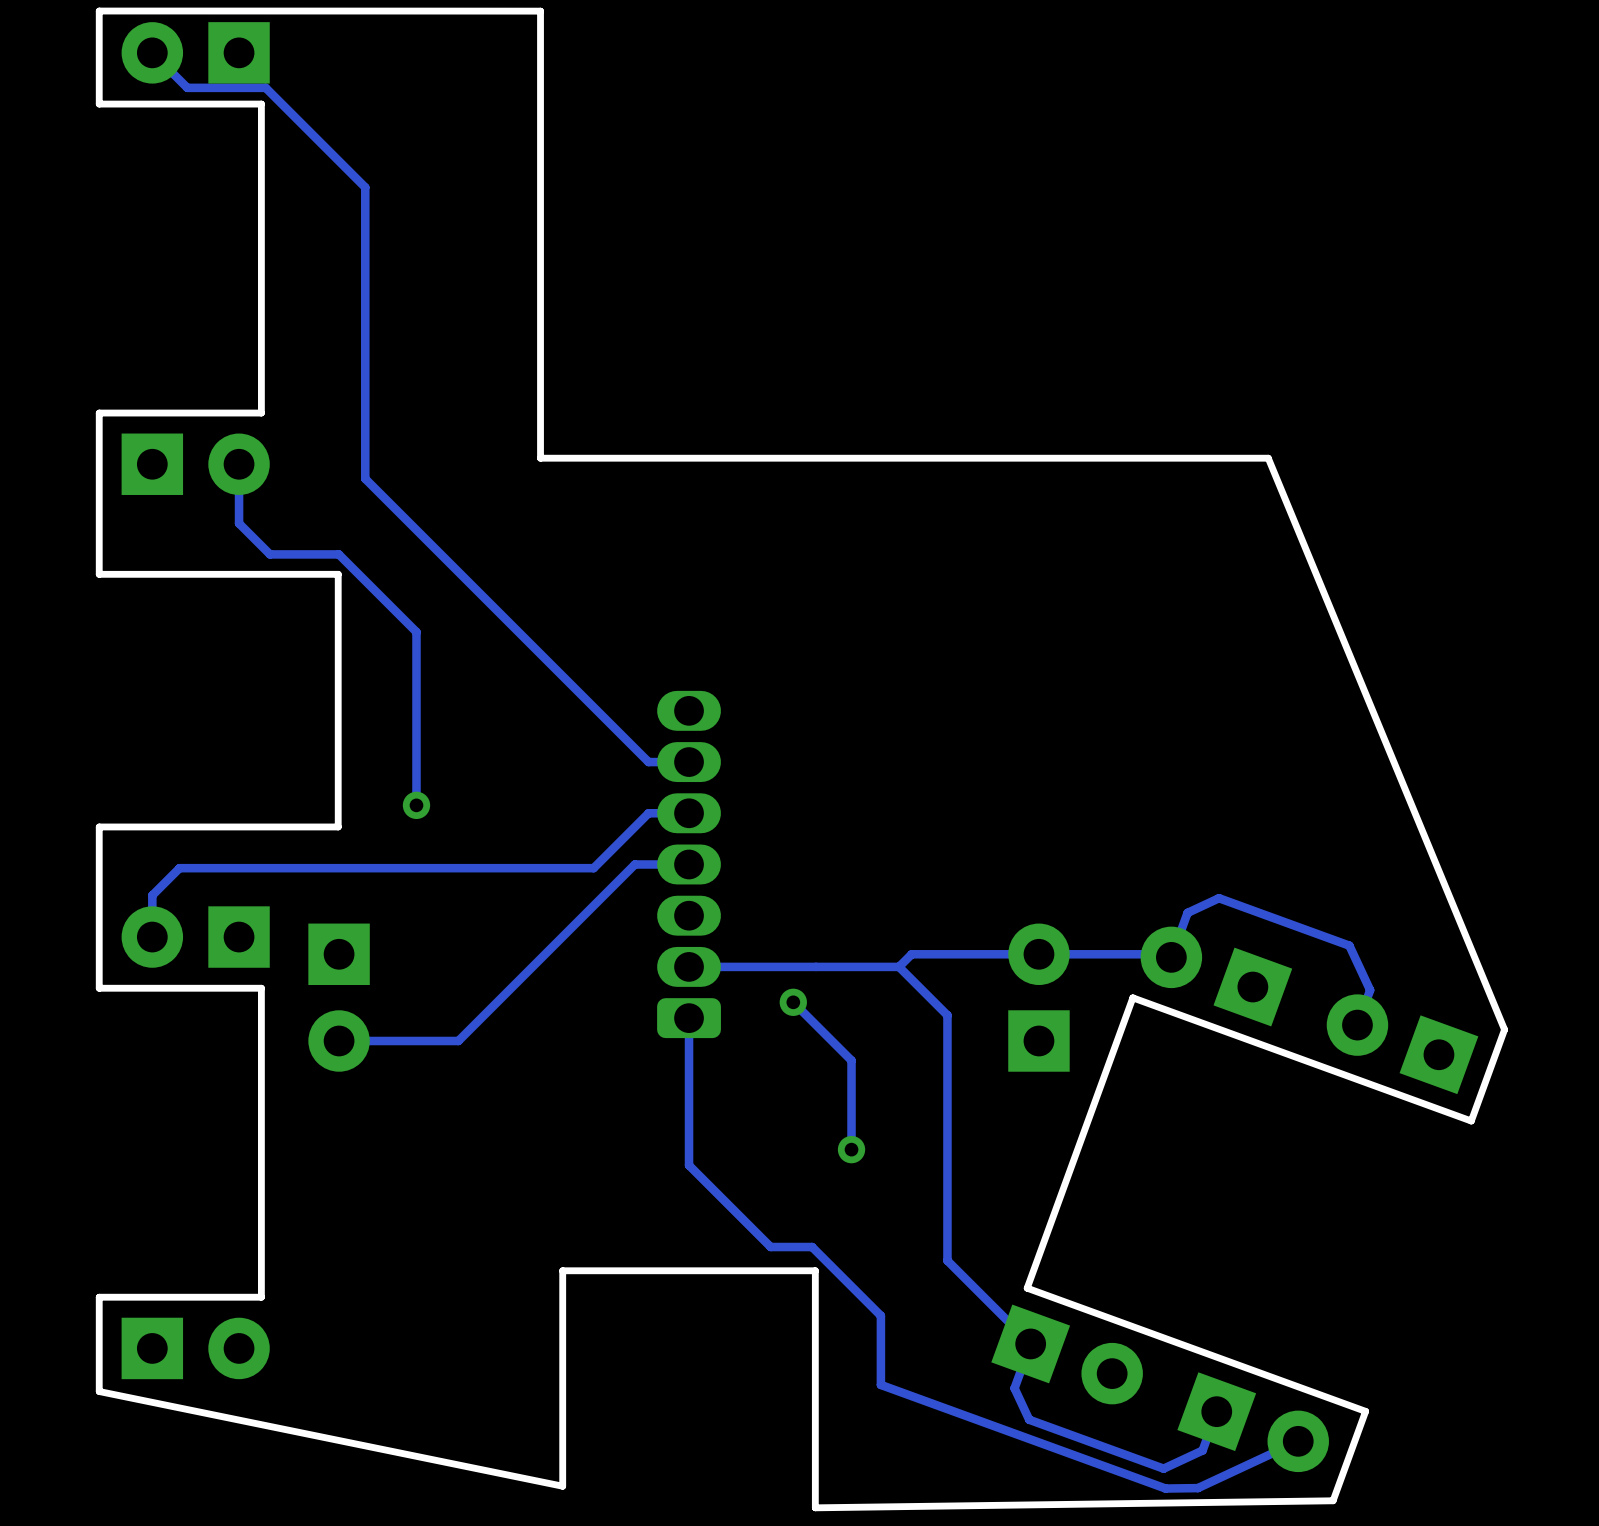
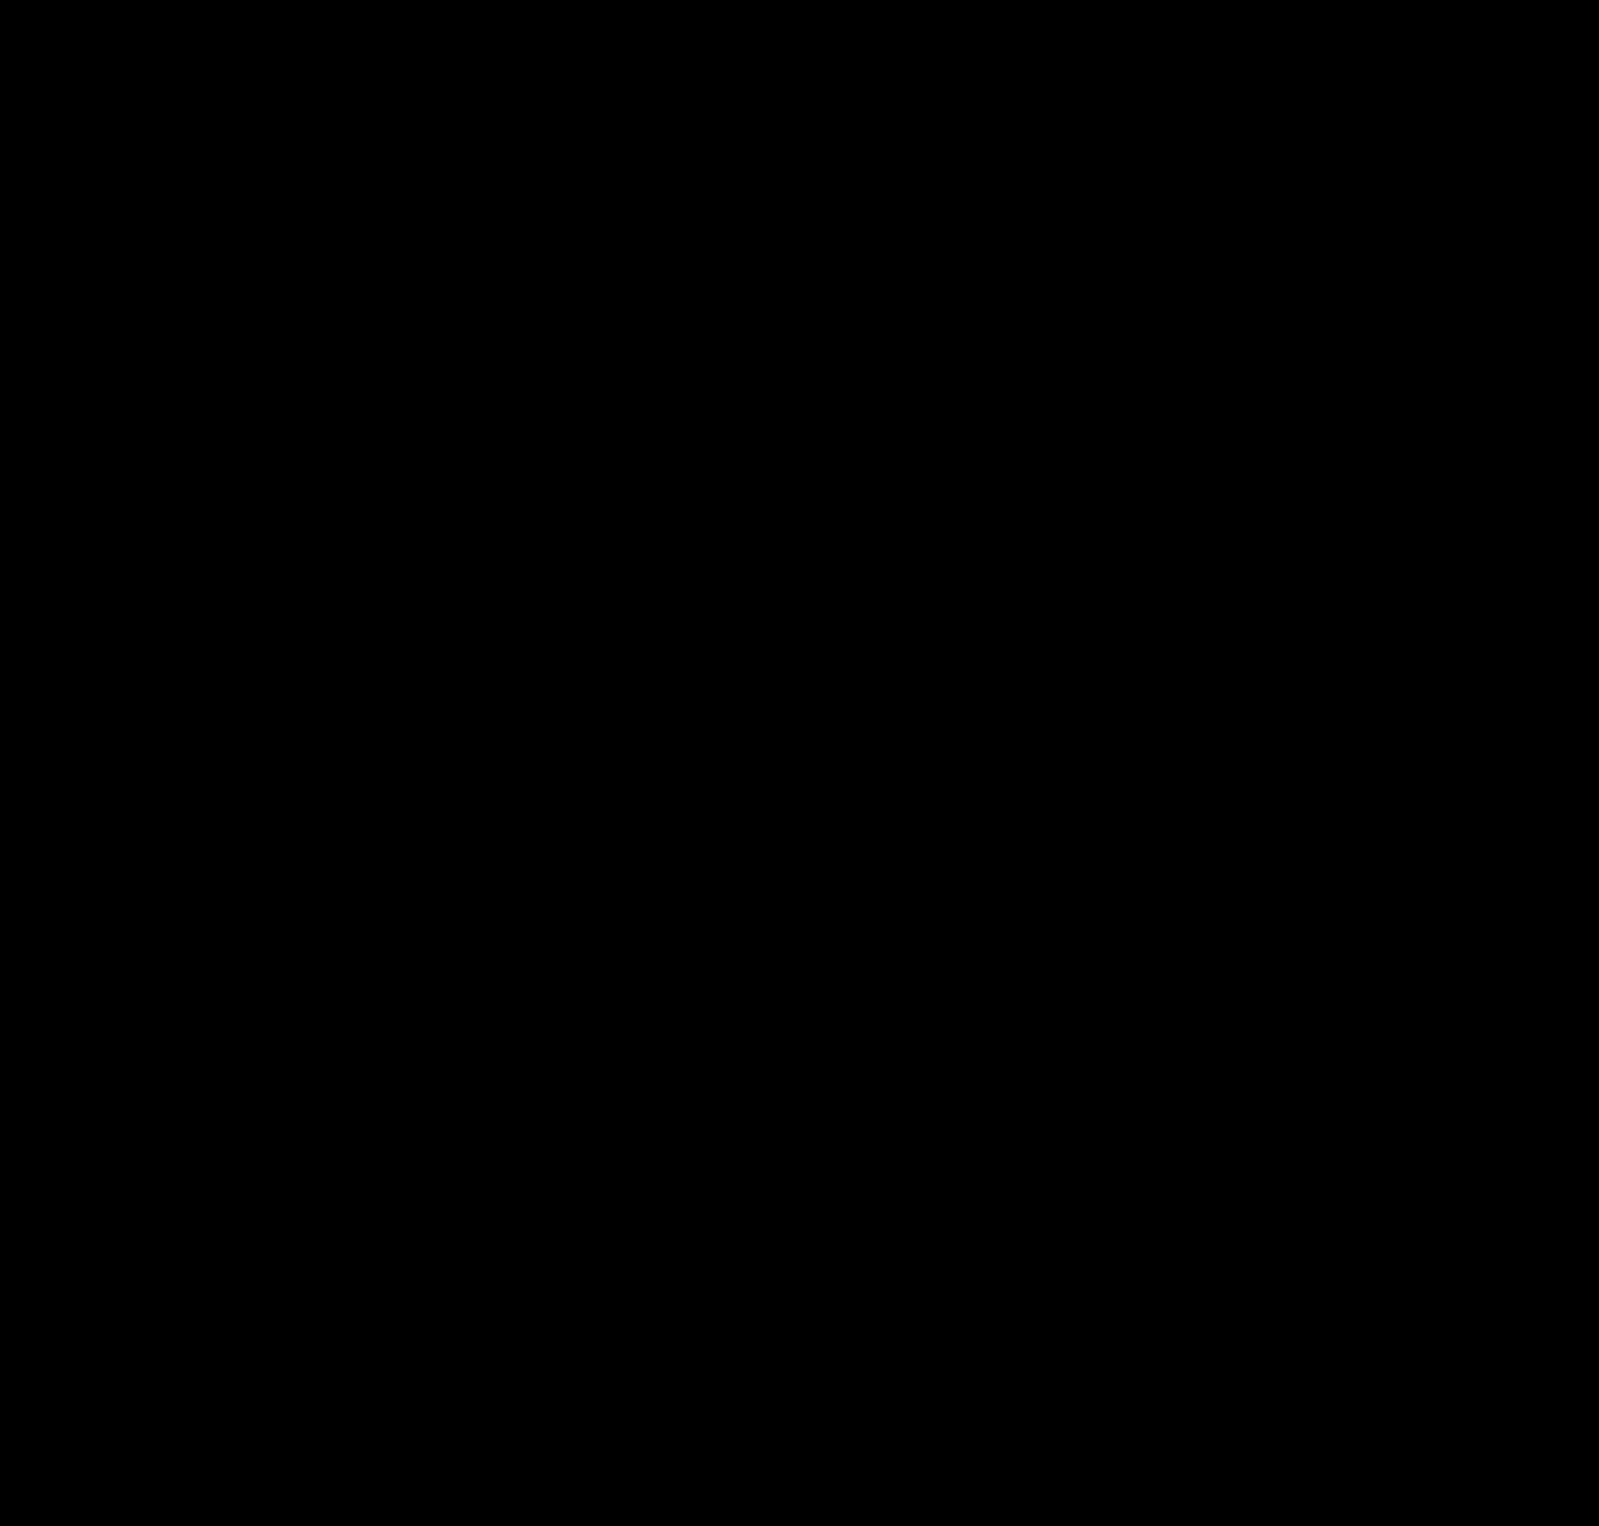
board edge: (540, 11) (540, 458) (1268, 458) (1504, 1029) (1471, 1121) (1132, 997) (1027, 1288) (1365, 1411) (1333, 1500) (815, 1507) (815, 1270) (562, 1270) (562, 1486) (99, 1391) (99, 1297) (261, 1297) (261, 988) (99, 988) (99, 826) (338, 826) (338, 574) (99, 574) (99, 413) (261, 413) (261, 104) (99, 104) (99, 11) (540, 11) -> none
track: (152, 52) (187, 87) (265, 87) (365, 187) (365, 478) (648, 762) (689, 762) -> none
part: (195, 52) -> none
part: (195, 464) -> none
track: (239, 464) (239, 523) (270, 554) (338, 554) (416, 632) (416, 805) -> none
via: (416, 805) -> none
track: (689, 813) (648, 813) (593, 868) (179, 868) (152, 895) (152, 937) -> none
track: (689, 864) (634, 864) (458, 1041) (339, 1041) -> none
part: (689, 864) -> none
part: (195, 937) -> none
track: (899, 966) (689, 966) -> none
track: (899, 966) (911, 954) (1168, 954) (1171, 957) (1187, 912) (1219, 898) (1349, 945) (1370, 990) (1357, 1025) -> none
track: (899, 966) (947, 1015) (947, 1260) (1030, 1343) (1014, 1388) (1029, 1419) (1163, 1468) (1202, 1450) (1216, 1411) -> none
part: (1216, 976) -> none
part: (339, 997) -> none
part: (1038, 997) -> none
track: (793, 1002) (851, 1060) (851, 1149) -> none
via: (793, 1002) -> none
track: (689, 1018) (689, 1165) (770, 1247) (812, 1247) (880, 1315) (880, 1384) (1165, 1488) (1197, 1488) (1298, 1441) -> none
part: (1402, 1044) -> none
via: (851, 1149) -> none
part: (195, 1348) -> none
part: (1067, 1354) -> none
part: (1253, 1422) -> none

